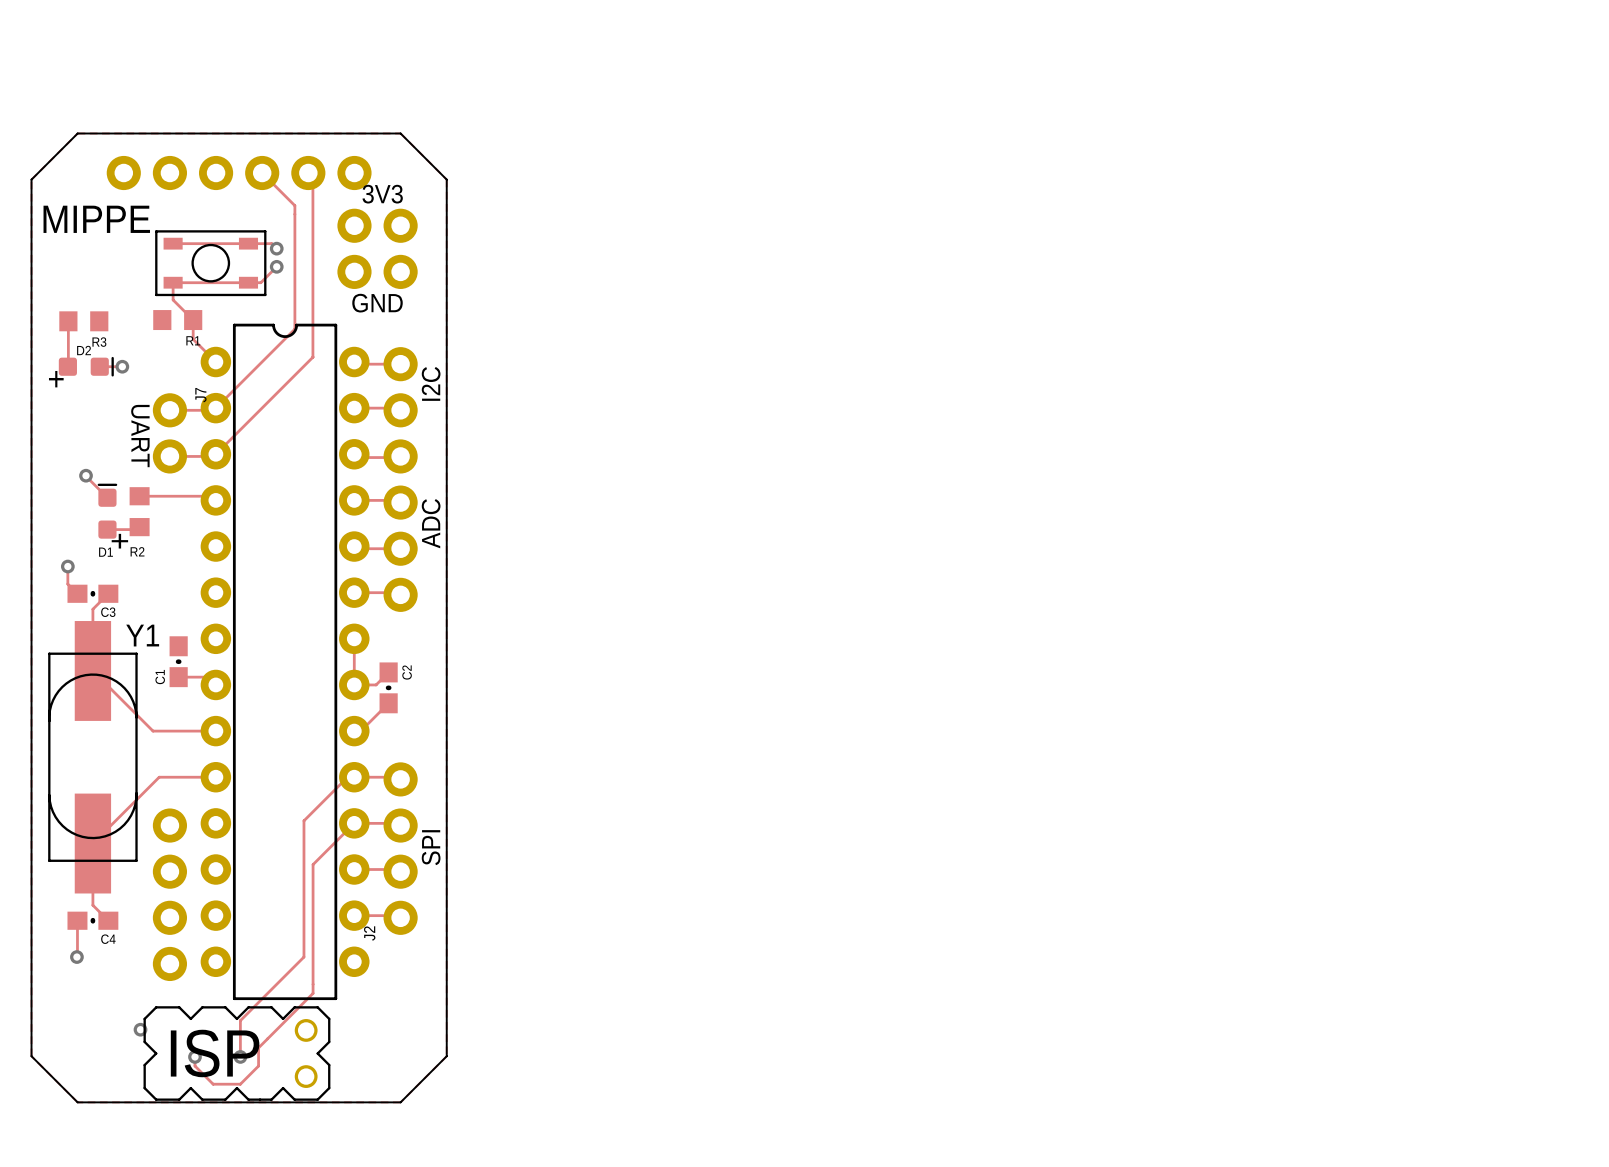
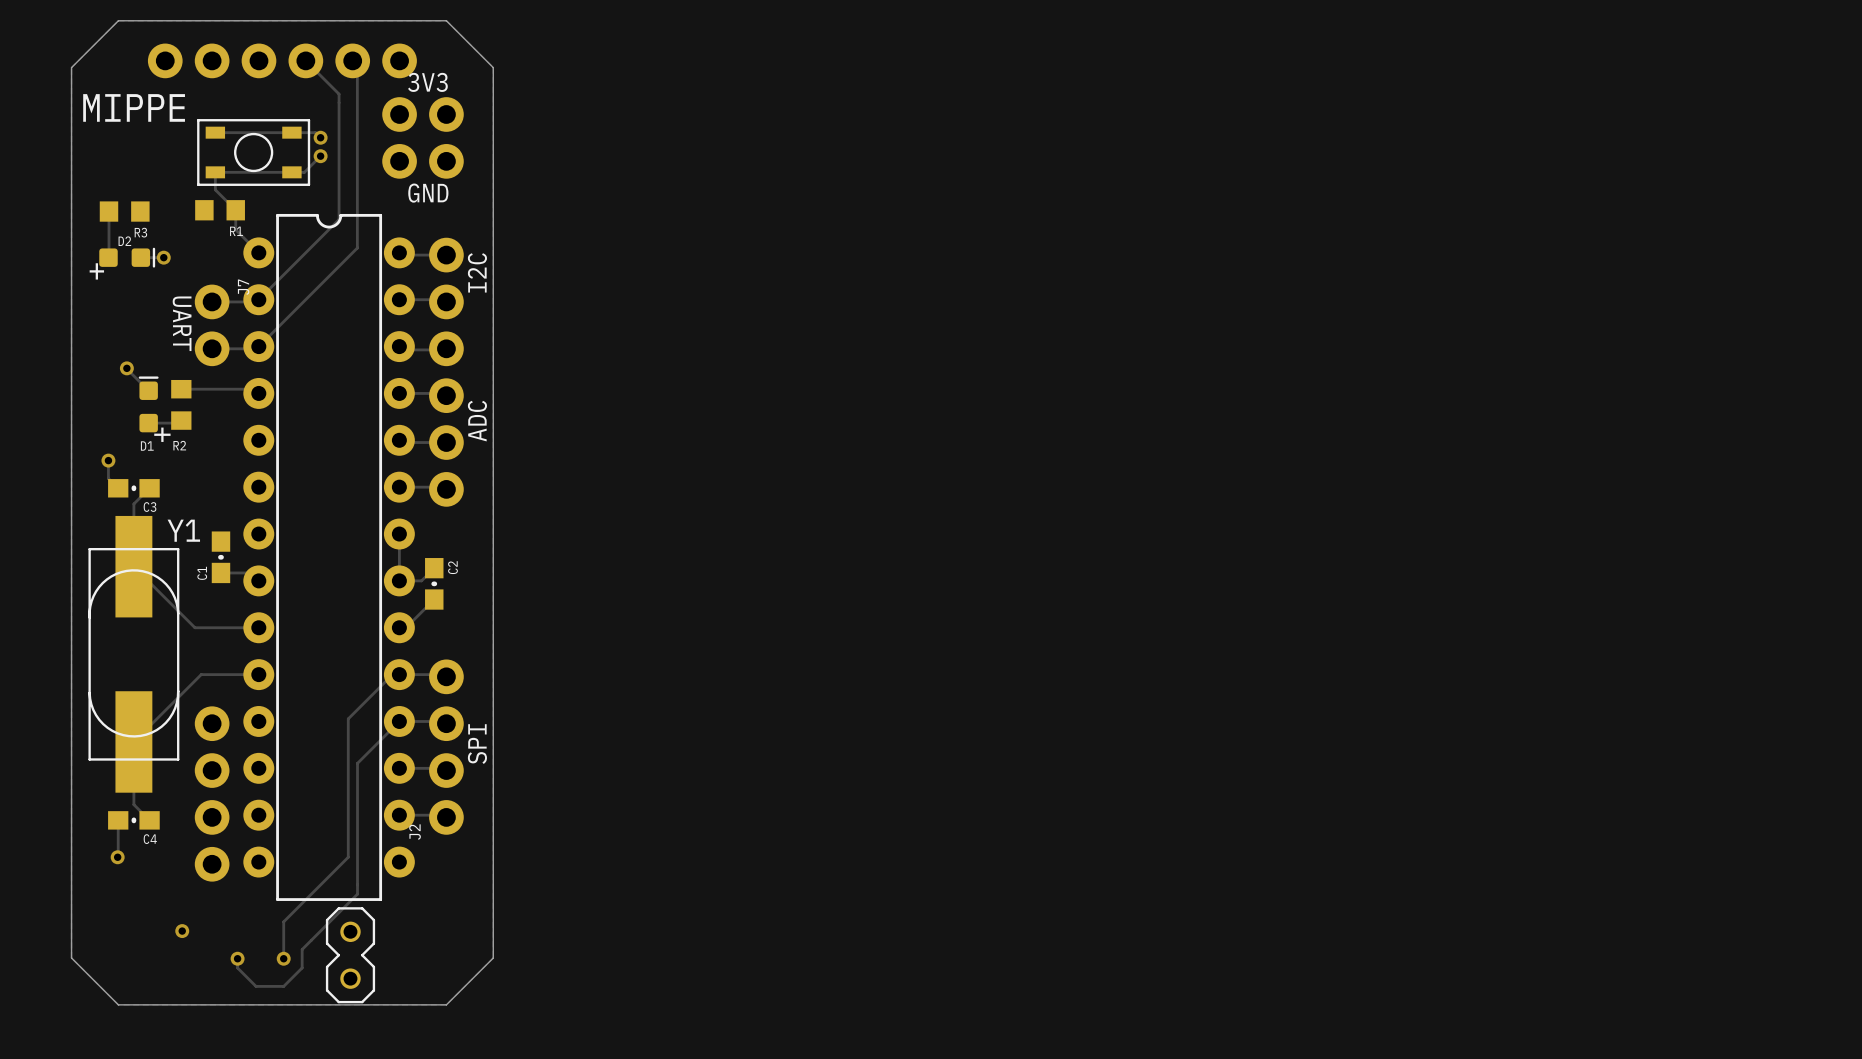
part: (236, 1053) -> none
part: none -> (350, 955)

